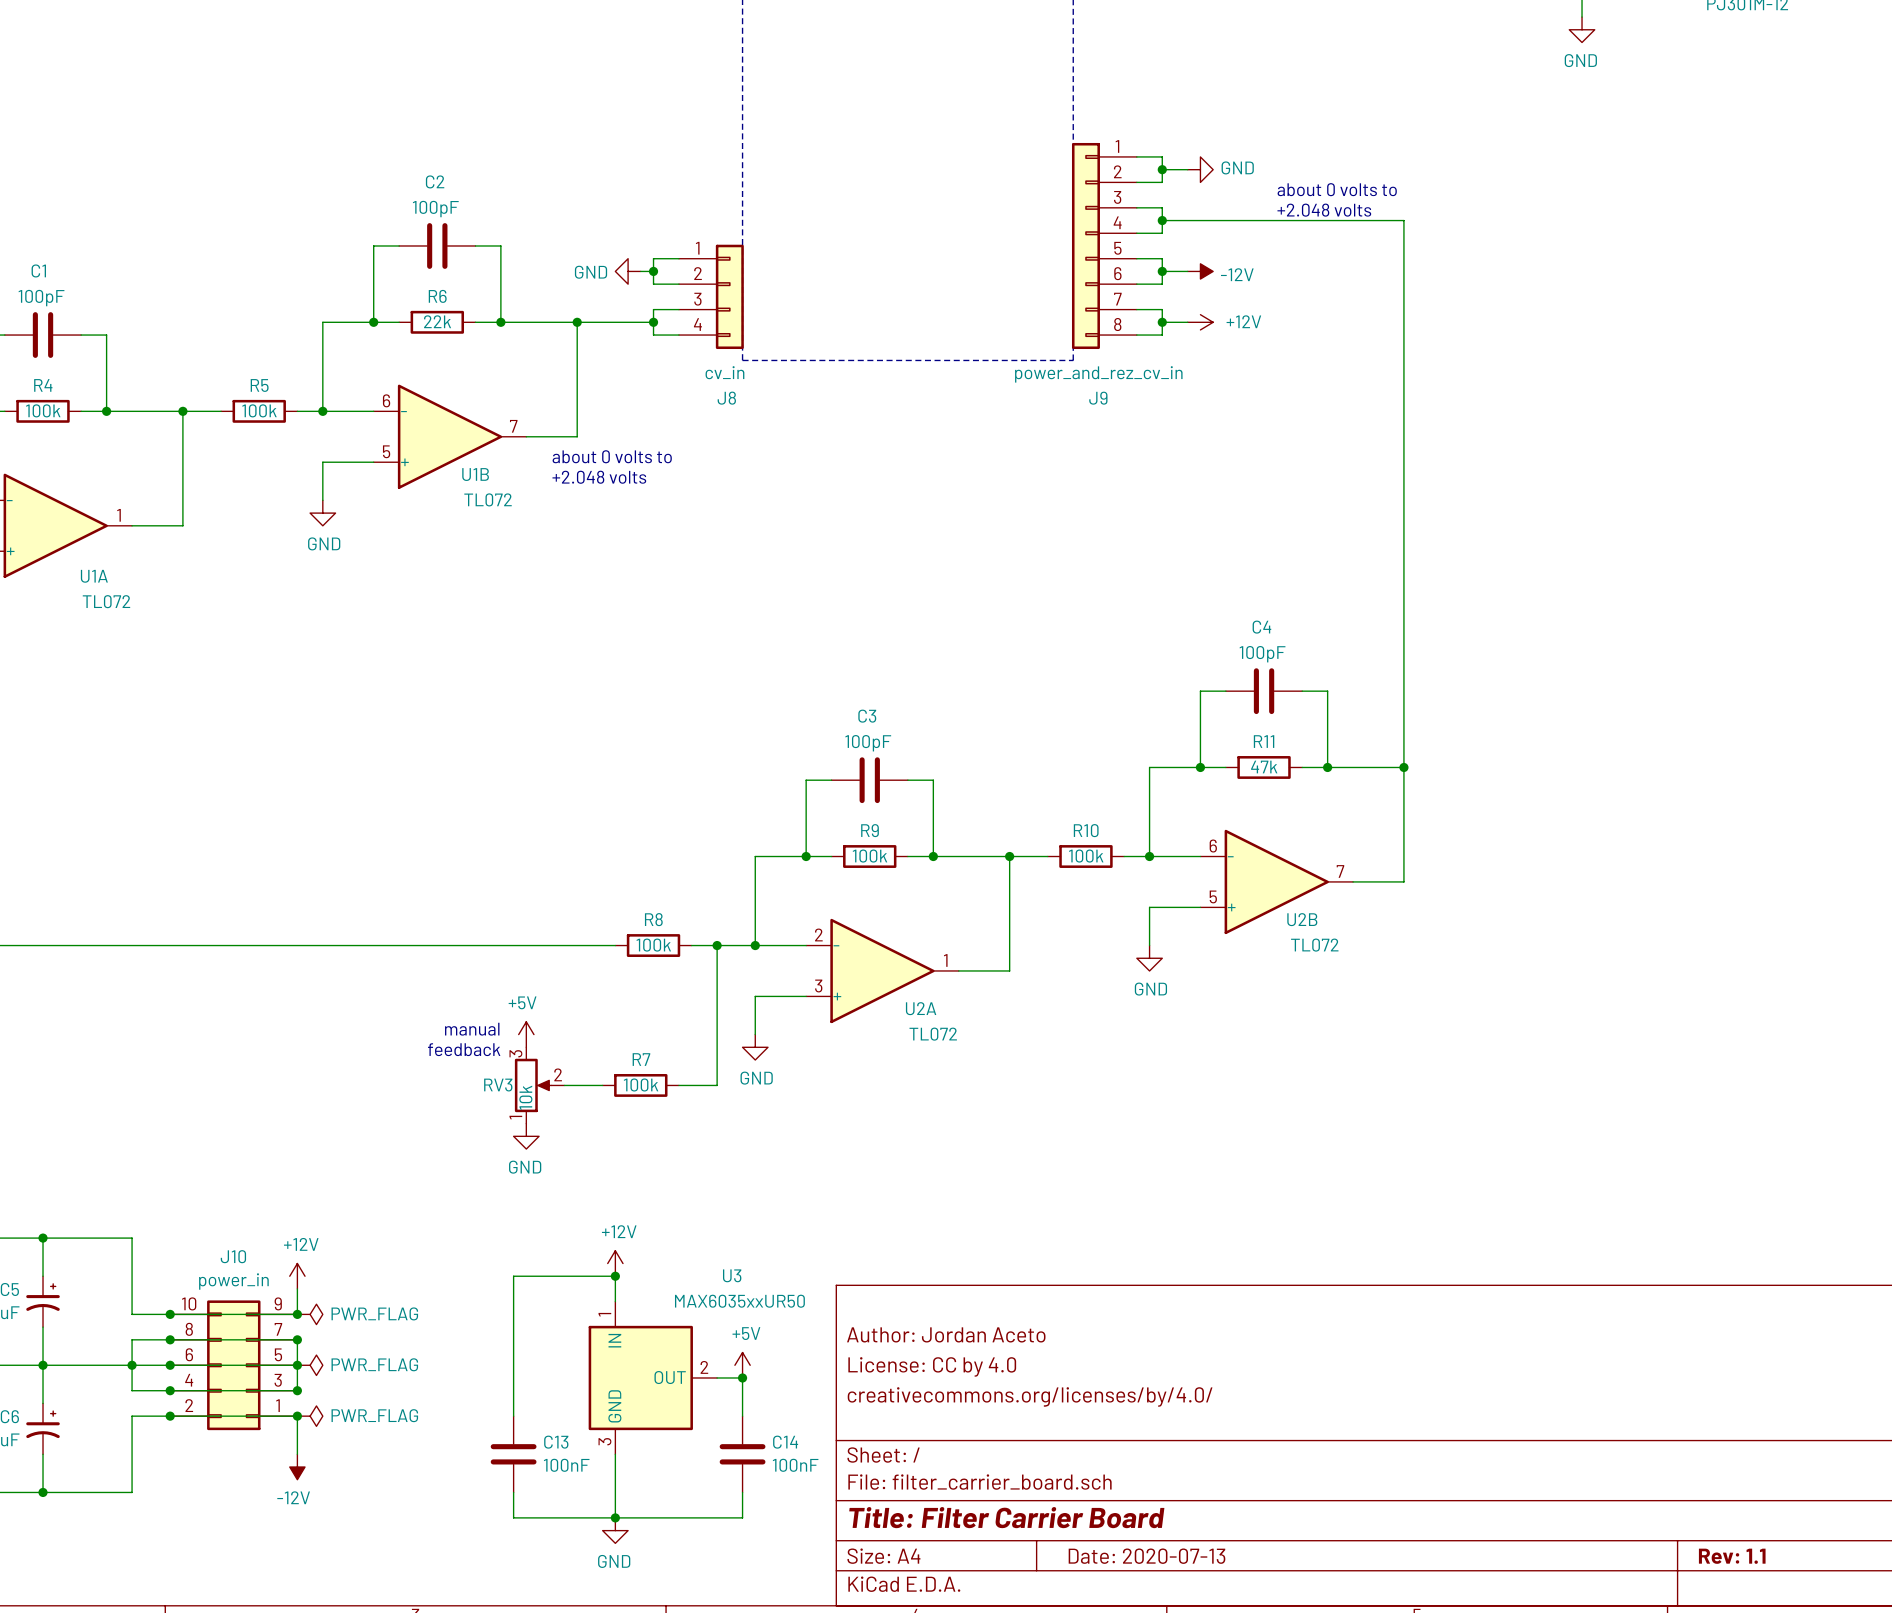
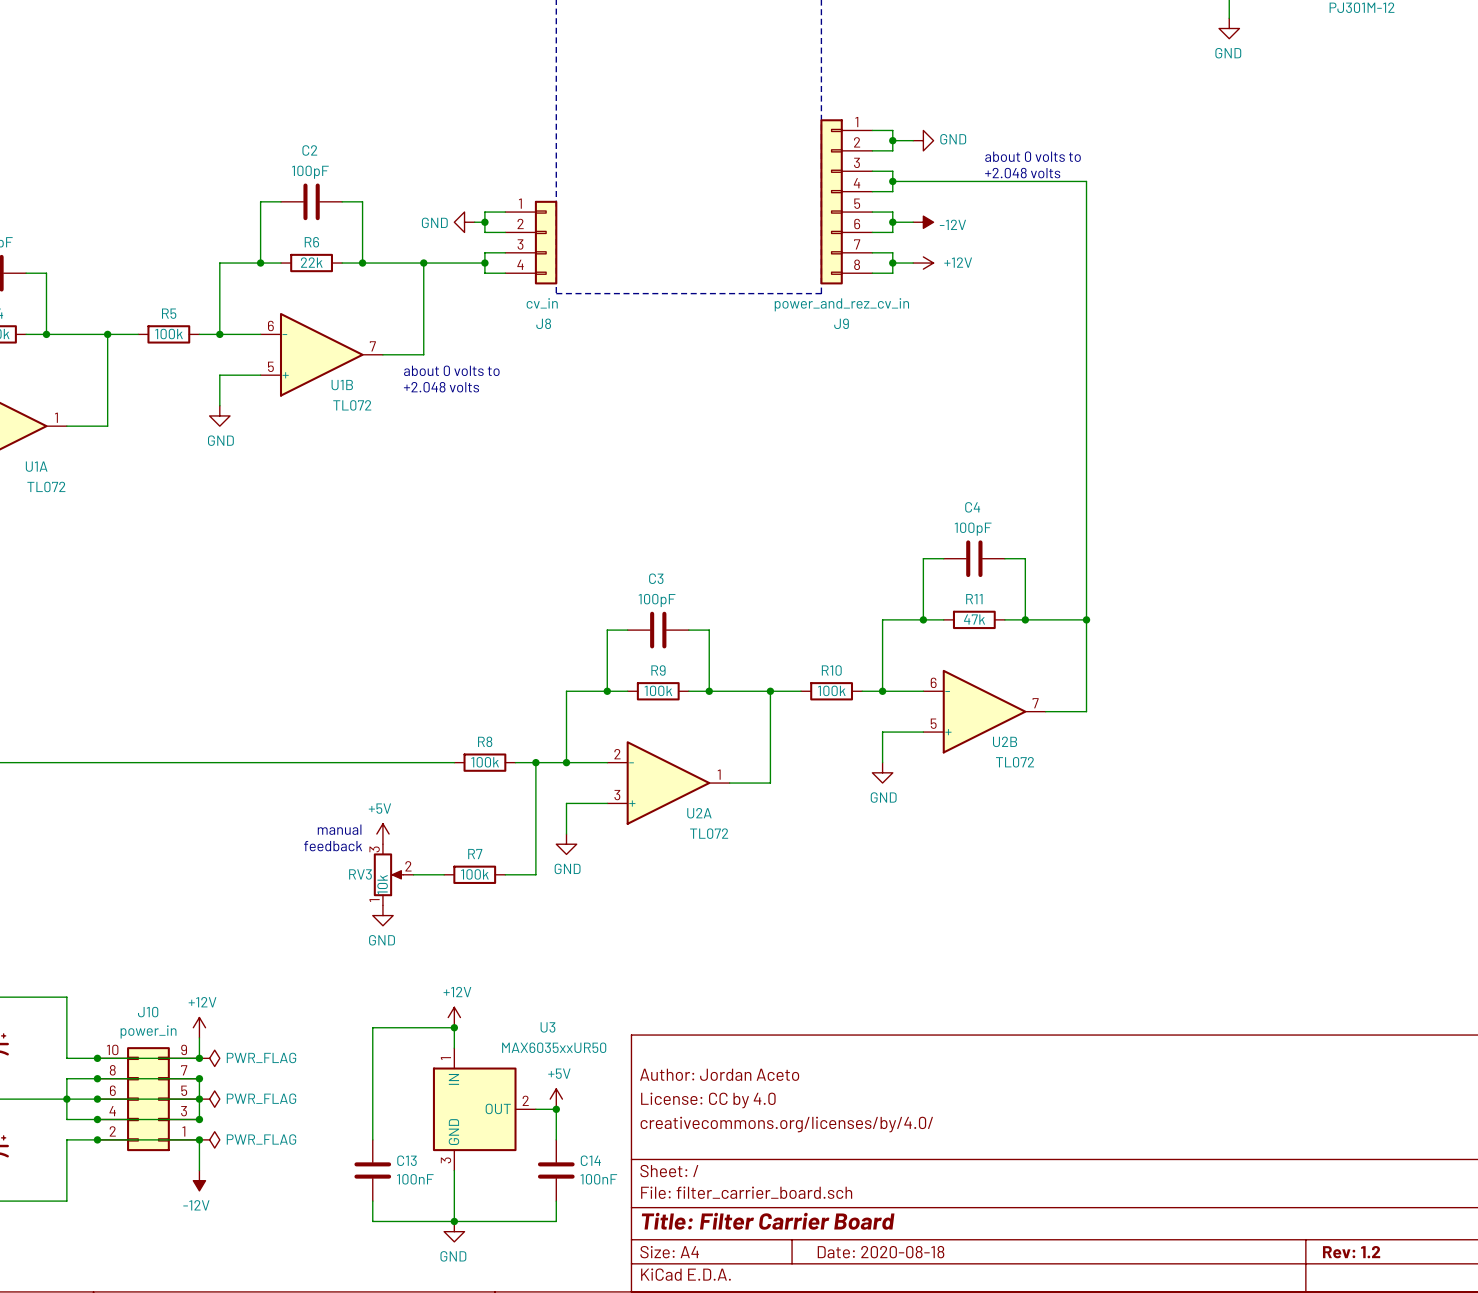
title block: Date: 2020-07-13 (1147, 1556) -> Date: 2020-08-18 (881, 1252)
title block: Rev: 1.1 (1732, 1556) -> Rev: 1.2 (1351, 1252)

